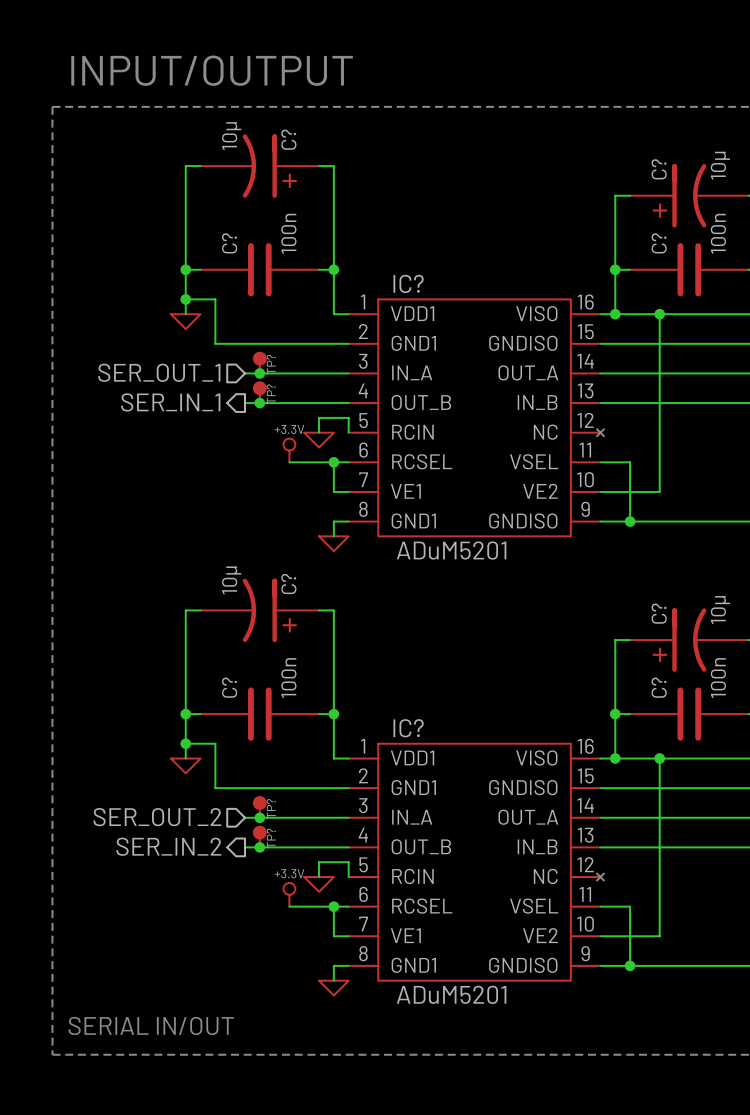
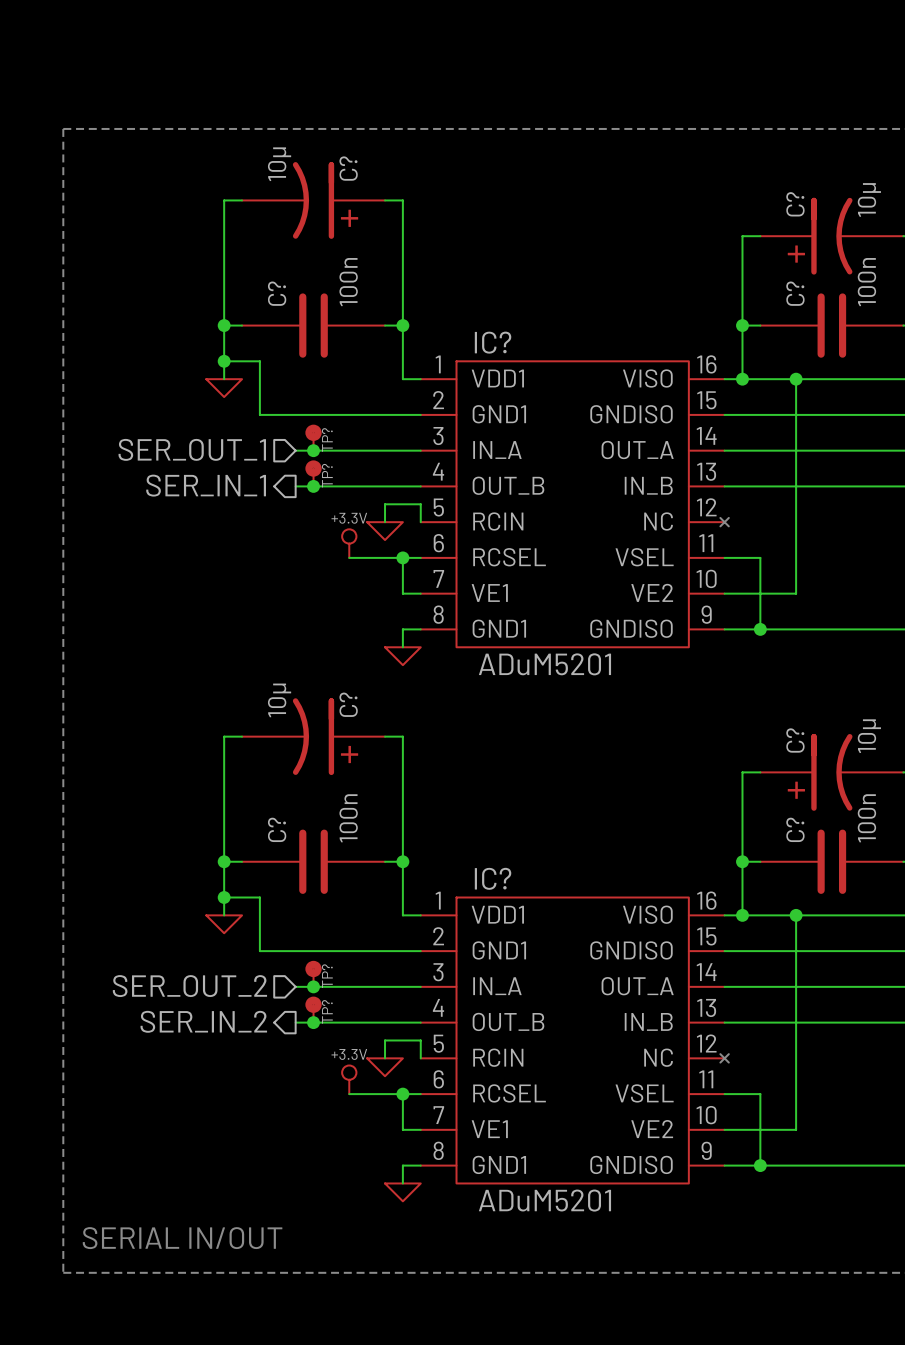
text: INPUT/OUTPUT (212, 70) -> none

